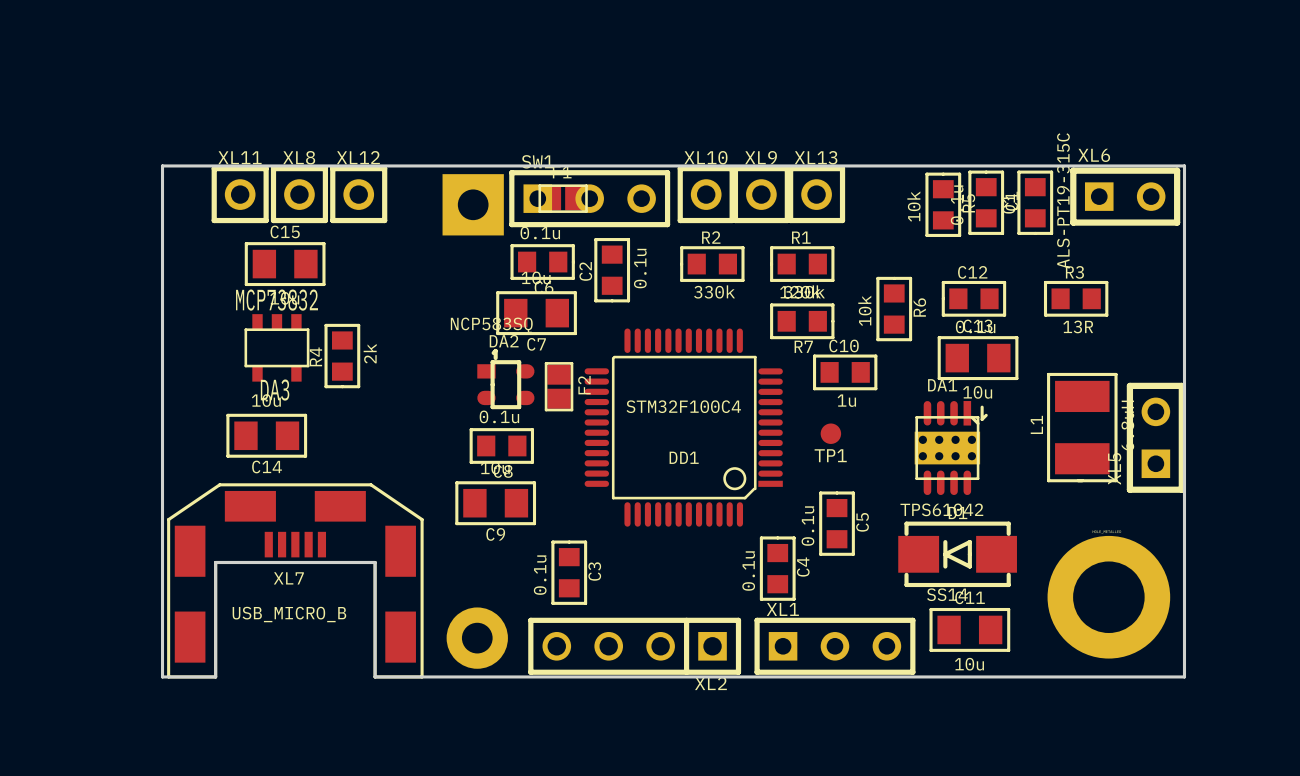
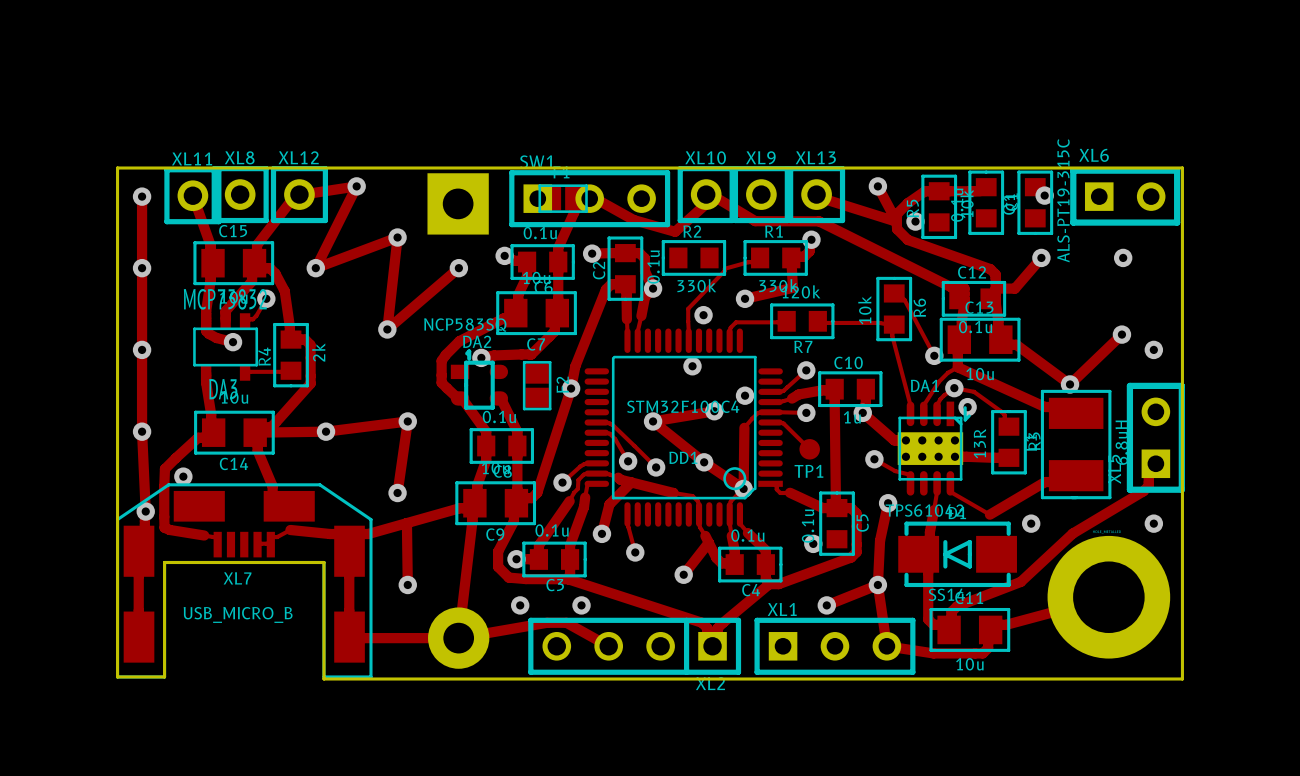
XL11 name: XL11 (239, 157) -> XL8 (239, 157)
XL8 name: XL8 (299, 157) -> XL12 (298, 157)
via: none -> (356, 186)
track: none -> (877, 186) (896, 221)
via: none -> (877, 186)
track: none -> (980, 191) (925, 191) (907, 203) (897, 213) (896, 221)
XL12: (358, 194) -> none
track: none -> (192, 195) (210, 245) (213, 263) (206, 311) (206, 330) (216, 338) (233, 342)
XL11: none -> (192, 195)
via: none -> (1044, 195)
track: none -> (142, 196) (142, 431) (145, 511) (144, 529) (138, 550) (138, 636)
via: none -> (142, 196)
track: none -> (816, 196) (896, 221)
part position: (473, 204) -> (458, 203)
R5 rotation: 0° (943, 204) -> 180° (939, 206)
track: none -> (896, 221) (897, 229) (907, 239) (990, 269) (995, 274) (995, 302) (1000, 339) (1007, 344) (1016, 344) (1070, 384) (1121, 334)
via: none -> (915, 221)
via: none -> (397, 237)
track: none -> (811, 239) (809, 251) (804, 256) (791, 257) (792, 287) (745, 298)
via: none -> (811, 239)
track: none -> (592, 253) (639, 253) (644, 258) (644, 271) (653, 288) (644, 297) (637, 331) (637, 340)
via: none -> (592, 253)
track: none -> (504, 255) (514, 260) (527, 262) (527, 276) (518, 295) (515, 313) (509, 318) (504, 318) (459, 341) (441, 360) (441, 382) (458, 398) (462, 398) (486, 431) (486, 460) (477, 485) (477, 494) (472, 512) (458, 638)
via: none -> (504, 255)
track: none -> (760, 257) (753, 262) (724, 268) (688, 308) (688, 340)
track: none -> (1041, 257) (1014, 288) (995, 288)
via: none -> (1041, 257)
via: none -> (1123, 257)
track: none -> (254, 263) (261, 268) (270, 268) (275, 273) (284, 291) (291, 339) (305, 339) (310, 344) (310, 357) (310, 383) (270, 427) (261, 427) (255, 432)
C15 position: (285, 264) -> (233, 263)
R2 position: (712, 264) -> (693, 257)
R1 position: (802, 264) -> (775, 257)
via: none -> (142, 268)
via: none -> (315, 268)
track: none -> (458, 268) (387, 329) (397, 237) (315, 268) (356, 186) (295, 195) (257, 245) (252, 281) (225, 311) (225, 321)
via: none -> (458, 268)
C2 position: (612, 270) -> (625, 268)
via: none -> (653, 288)
track: none -> (888, 293) (901, 296) (904, 300) (934, 355)
track: none -> (266, 298) (256, 315) (252, 319) (245, 321)
via: none -> (266, 298)
via: none -> (745, 298)
R3 rotation: 0° (1076, 298) -> 90° clockwise (1008, 442)
R3 position: (1076, 298) -> (1008, 442)
via: none -> (703, 315)
track: none -> (786, 321) (736, 322) (730, 327) (729, 340)
track: none -> (817, 321) (888, 324) (892, 331) (910, 405) (910, 413)
via: none -> (387, 329)
via: none -> (1121, 334)
track: none -> (627, 340) (626, 288) (625, 284) (611, 284) (605, 289) (575, 366) (571, 388) (537, 492) (531, 498) (523, 498) (516, 503)
via: none -> (233, 342)
DA3 position: (276, 347) -> (225, 346)
via: none -> (142, 349)
via: none -> (1153, 349)
via: none -> (934, 355)
R4 position: (342, 356) -> (291, 355)
track: none -> (481, 357) (494, 355) (531, 354) (554, 331) (558, 303) (558, 247) (574, 212) (575, 196) (591, 196) (633, 220) (675, 231) (714, 196) (755, 221) (819, 221) (951, 287) (964, 288) (961, 330) (957, 348) (957, 367)
via: none -> (481, 357)
C13 position: (978, 358) -> (980, 339)
via: none -> (692, 366)
track: none -> (957, 367) (1045, 407) (1054, 407) (1076, 413)
track: none -> (957, 367) (947, 372) (939, 381) (923, 405) (923, 413)
track: none -> (291, 370) (245, 372)
track: none -> (806, 370) (783, 390) (770, 391)
via: none -> (806, 370)
track: none -> (206, 372) (213, 432) (207, 437) (198, 437) (164, 469) (164, 527) (215, 537) (217, 543)
C10 position: (845, 372) -> (850, 389)
DA2 position: (505, 379) -> (479, 379)
via: none -> (1070, 384)
F2 position: (559, 386) -> (537, 385)
via: none -> (571, 388)
via: none -> (954, 388)
track: none -> (865, 389) (865, 403) (862, 412) (894, 440) (905, 440)
via: none -> (745, 395)
track: none -> (500, 398) (517, 431) (516, 503)
track: none -> (770, 402) (783, 401) (798, 394) (834, 389) (837, 508)
via: none -> (967, 407)
track: none -> (714, 411) (653, 421) (704, 462) (743, 488)
via: none -> (714, 411)
track: none -> (806, 412) (761, 412) (757, 413) (744, 427) (743, 488)
via: none -> (806, 412)
via: none -> (862, 412)
track: none -> (937, 413) (937, 405) (940, 399) (954, 388) (973, 391) (1001, 411) (1004, 415) (1004, 419) (1008, 426)
via: none -> (407, 421)
via: none -> (653, 421)
track: none -> (596, 422) (606, 422) (613, 425) (656, 467)
track: none -> (770, 422) (783, 423) (809, 449)
L1 position: (1082, 427) -> (1076, 444)
via: none -> (142, 431)
via: none -> (326, 431)
track: none -> (255, 432) (326, 431) (407, 421) (397, 492)
track: none -> (255, 432) (257, 450) (272, 486) (272, 495) (288, 505)
track: none -> (596, 432) (609, 433) (615, 439) (628, 461)
TP1 position: (830, 433) -> (809, 449)
C14 position: (266, 435) -> (234, 432)
DA1 position: (951, 448) -> (934, 448)
track: none -> (954, 456) (1008, 457)
track: none -> (874, 459) (895, 471) (910, 474) (910, 483)
via: none -> (874, 459)
via: none -> (628, 461)
via: none -> (704, 462)
track: none -> (596, 463) (583, 464) (562, 482)
via: none -> (656, 467)
track: none -> (1153, 467) (1148, 477) (1148, 485) (1143, 491) (1072, 533) (1020, 581) (956, 606) (951, 611) (949, 629) (942, 624) (933, 624) (928, 619) (928, 567) (918, 554) (929, 541) (937, 483)
track: none -> (1076, 475) (1054, 482) (1045, 482) (989, 514) (950, 491) (950, 483)
via: none -> (183, 476)
via: none -> (562, 482)
track: none -> (631, 482) (609, 504) (601, 533)
track: none -> (596, 483) (587, 483) (583, 507) (570, 545) (570, 573) (568, 579)
track: none -> (770, 483) (776, 484) (776, 489) (780, 493) (790, 492) (822, 508) (851, 508) (856, 513) (856, 552) (851, 557) (778, 584) (769, 584)
track: none -> (743, 488) (730, 501) (729, 505) (729, 523) (734, 550) (734, 564) (721, 563) (716, 557) (708, 542)
via: none -> (743, 488)
via: none -> (397, 492)
track: none -> (474, 503) (468, 508) (459, 508) (368, 534) (359, 534) (349, 550)
track: none -> (516, 503) (513, 521) (498, 551) (498, 566) (508, 577) (568, 579)
track: none -> (888, 503) (880, 540) (877, 584)
via: none -> (888, 503)
via: none -> (145, 511)
track: none -> (627, 514) (627, 523) (635, 552)
track: none -> (739, 514) (739, 523) (765, 550) (765, 578) (769, 584)
track: none -> (406, 523) (407, 584)
via: none -> (1031, 523)
via: none -> (1153, 523)
via: none -> (601, 533)
track: none -> (708, 542) (683, 574)
track: none -> (708, 542) (699, 523) (698, 501) (692, 496) (620, 479) (606, 473) (587, 473) (578, 480) (577, 488) (538, 545) (538, 559) (516, 559)
track: none -> (257, 543) (270, 543) (272, 537) (277, 537) (290, 529) (339, 534) (349, 550)
via: none -> (813, 543)
track: none -> (349, 550) (349, 636) (359, 638) (458, 638)
via: none -> (635, 552)
via: none -> (516, 559)
board edge: (215, 562) (215, 676) (164, 676) -> (215, 562) (164, 562) (164, 676)
board edge: (323, 562) (375, 562) (375, 676) (1184, 676) (1184, 165) (162, 165) (162, 676) -> (323, 562) (323, 679) (1182, 679) (1182, 168) (117, 168) (117, 676) (162, 676)
C4 rotation: 0° (777, 568) -> 90° clockwise (750, 564)
C3 rotation: 0° (569, 572) -> 90° clockwise (554, 559)
via: none -> (683, 574)
track: none -> (568, 579) (702, 622) (707, 628) (707, 637) (712, 646) (717, 637) (717, 628) (769, 584)
XL7 position: (295, 580) -> (244, 580)
via: none -> (407, 584)
track: none -> (877, 584) (886, 646) (933, 653) (982, 653) (988, 648) (990, 629) (997, 624) (1006, 624) (1108, 597)
track: none -> (877, 584) (826, 605)
via: none -> (877, 584)
via: none -> (520, 605)
via: none -> (581, 605)
via: none -> (826, 605)
track: none -> (458, 638) (547, 622) (566, 622) (608, 646)
part position: (477, 638) -> (458, 638)

